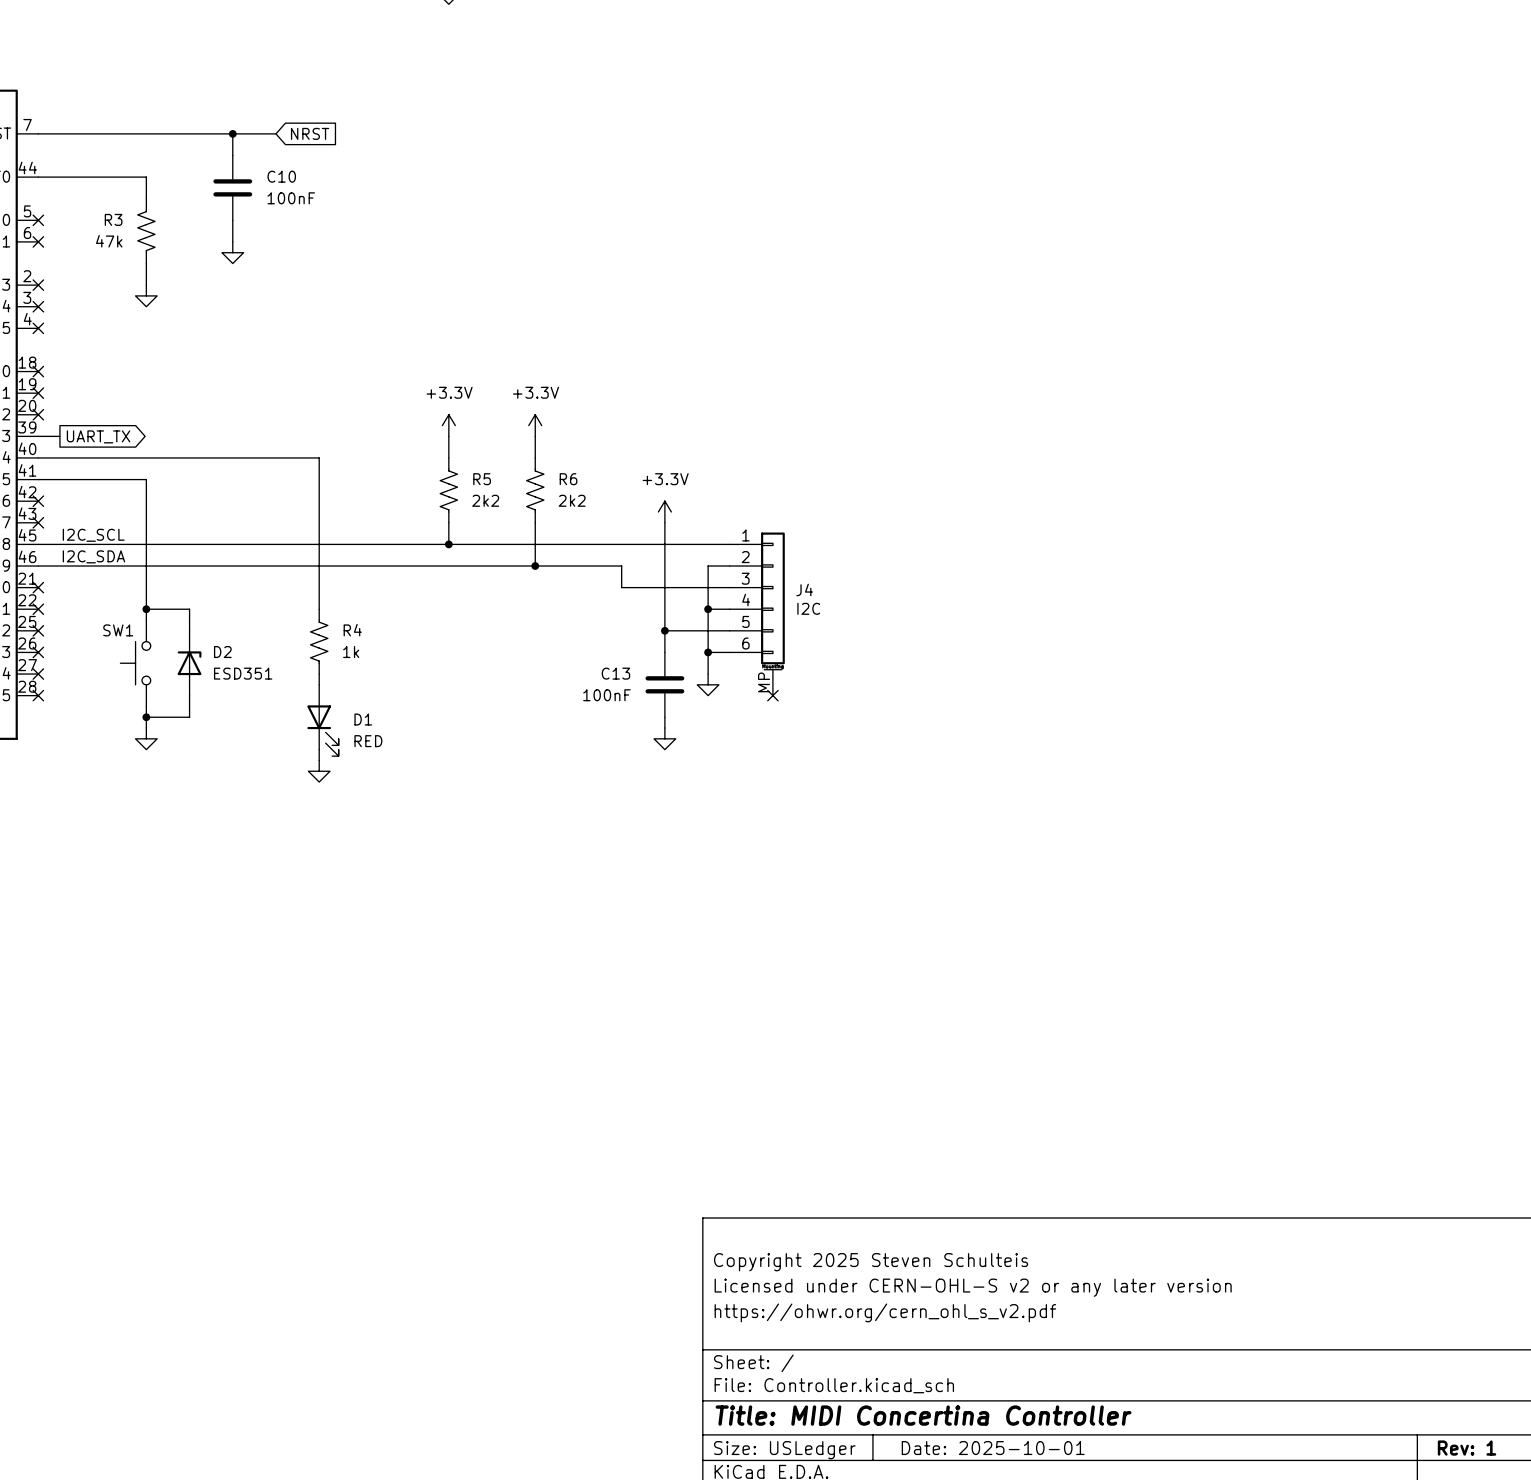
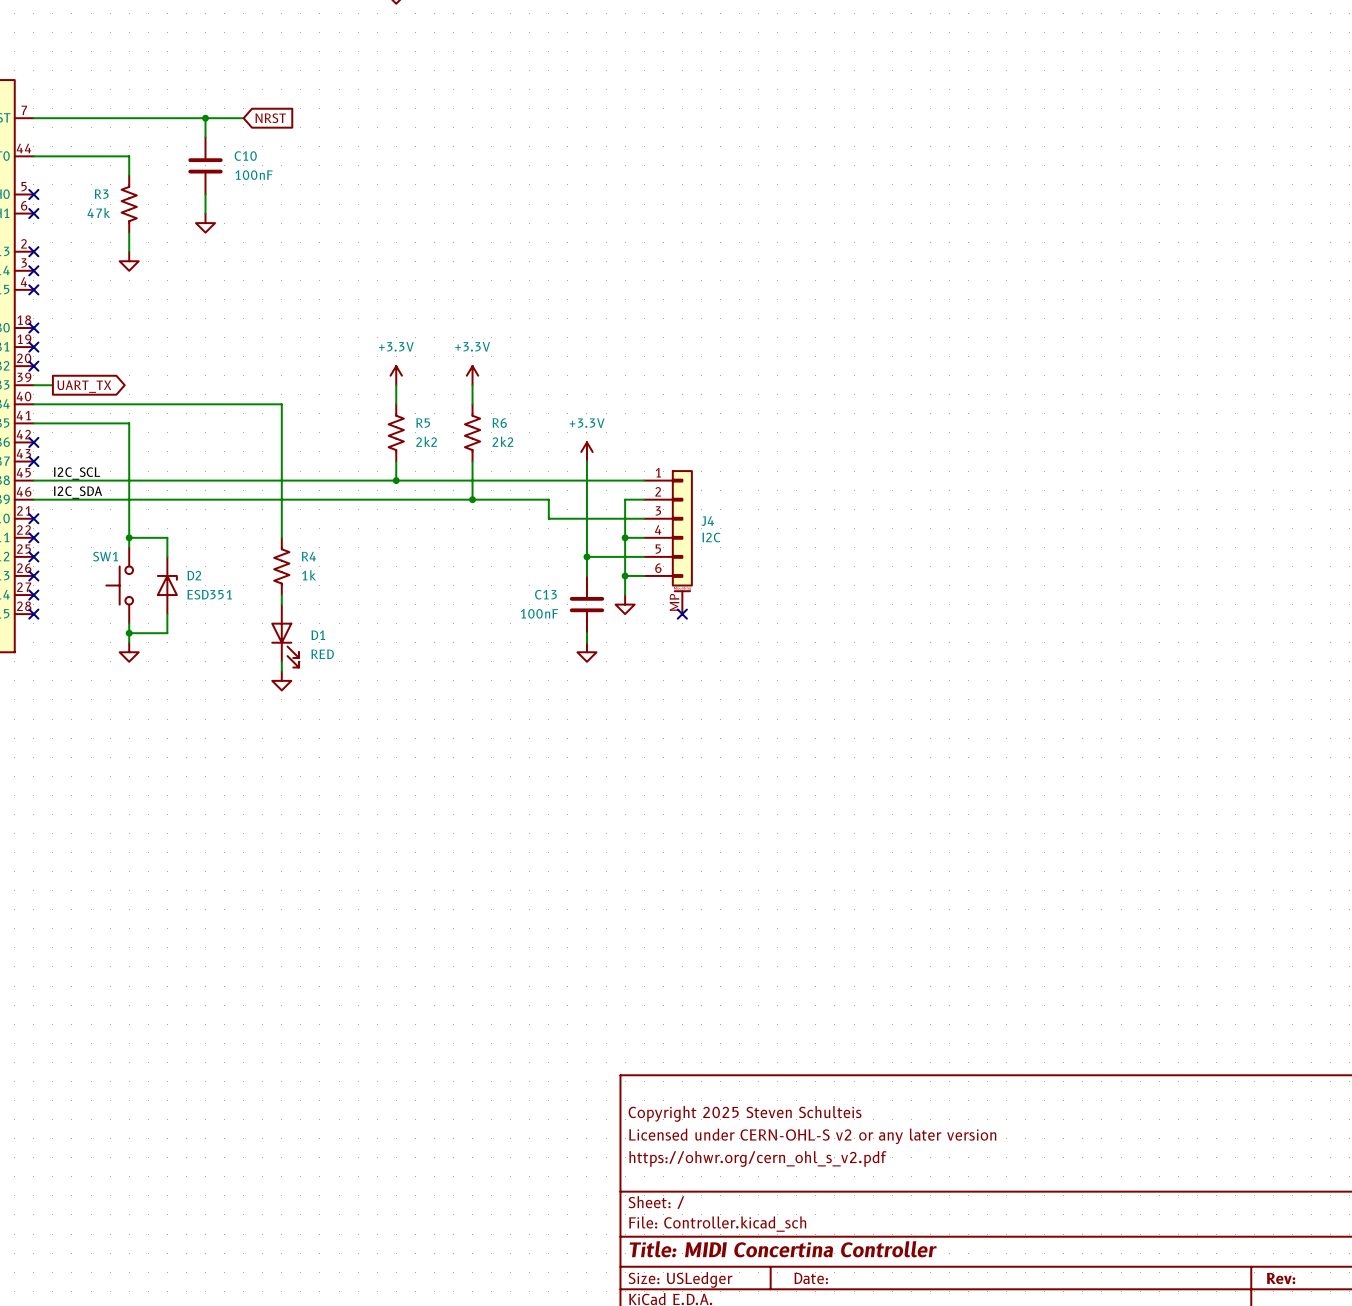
title block: Date: 2025-10-01 (993, 1448) -> Date: (811, 1278)
title block: Rev: 1 (1467, 1448) -> Rev: (1281, 1278)

